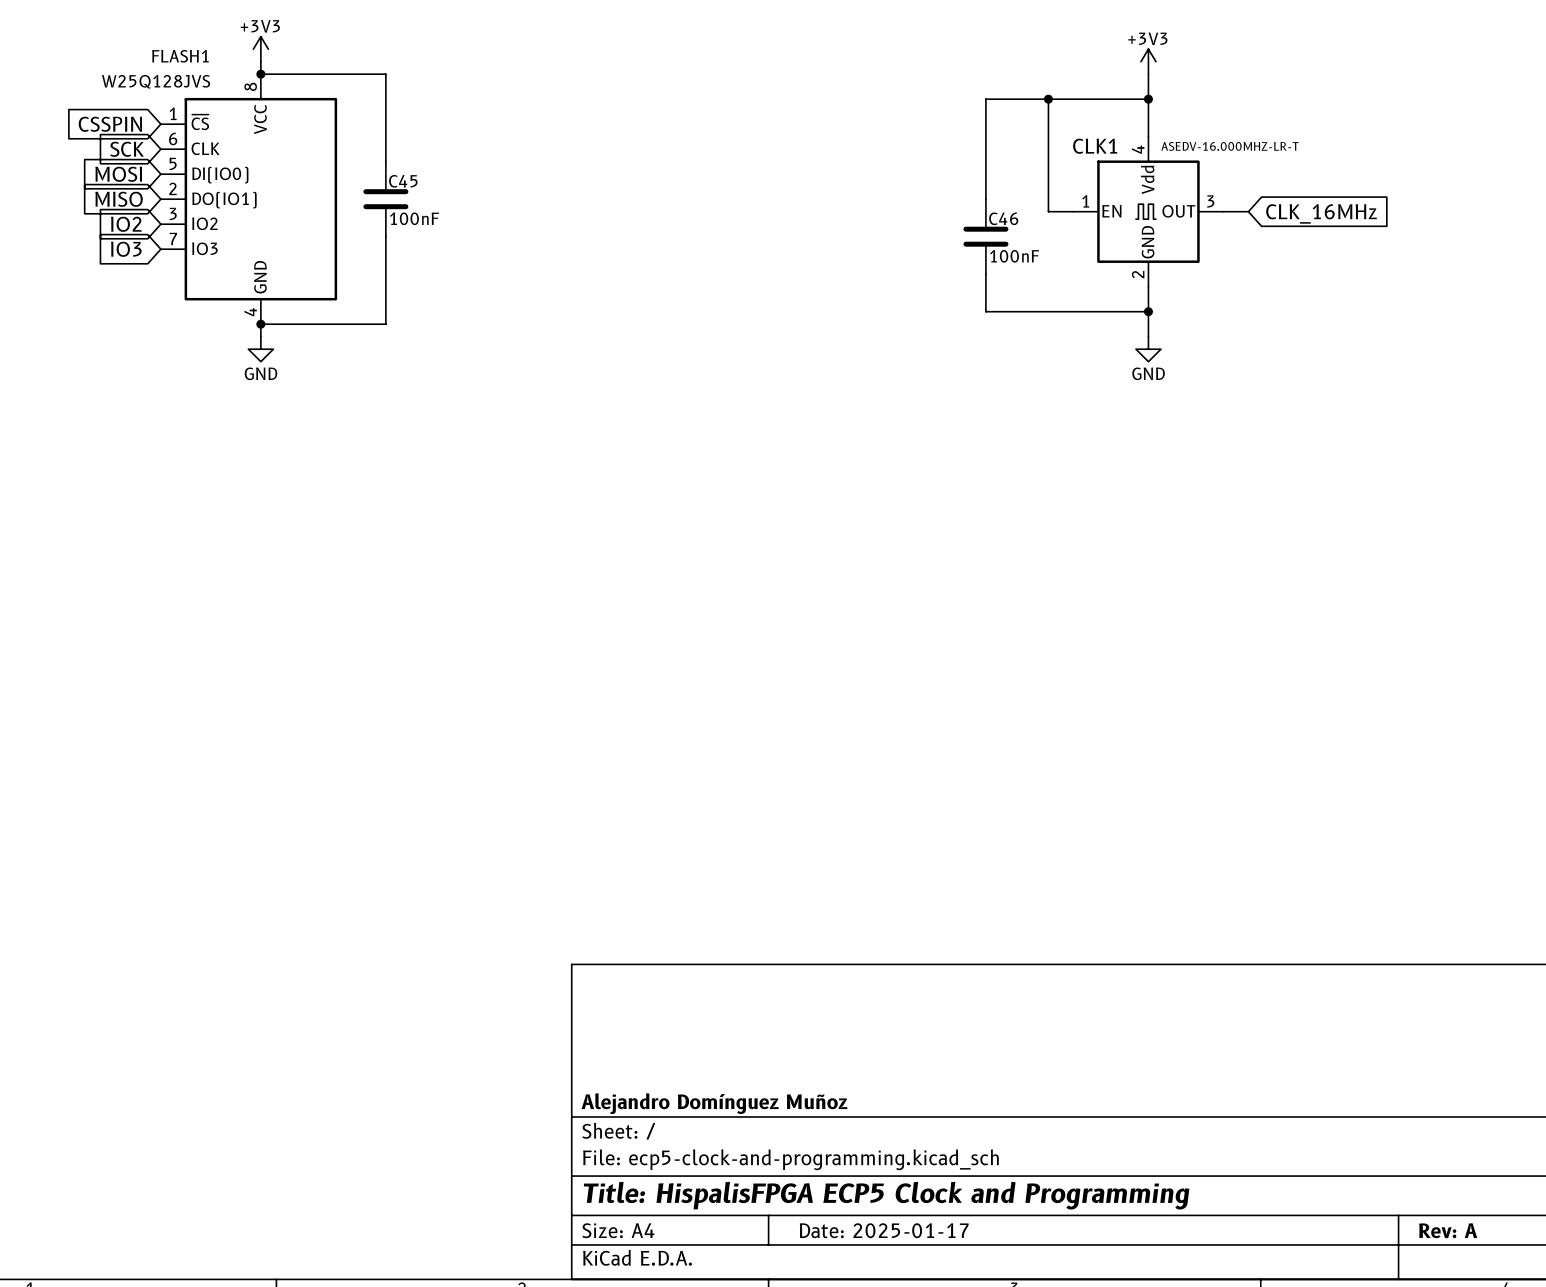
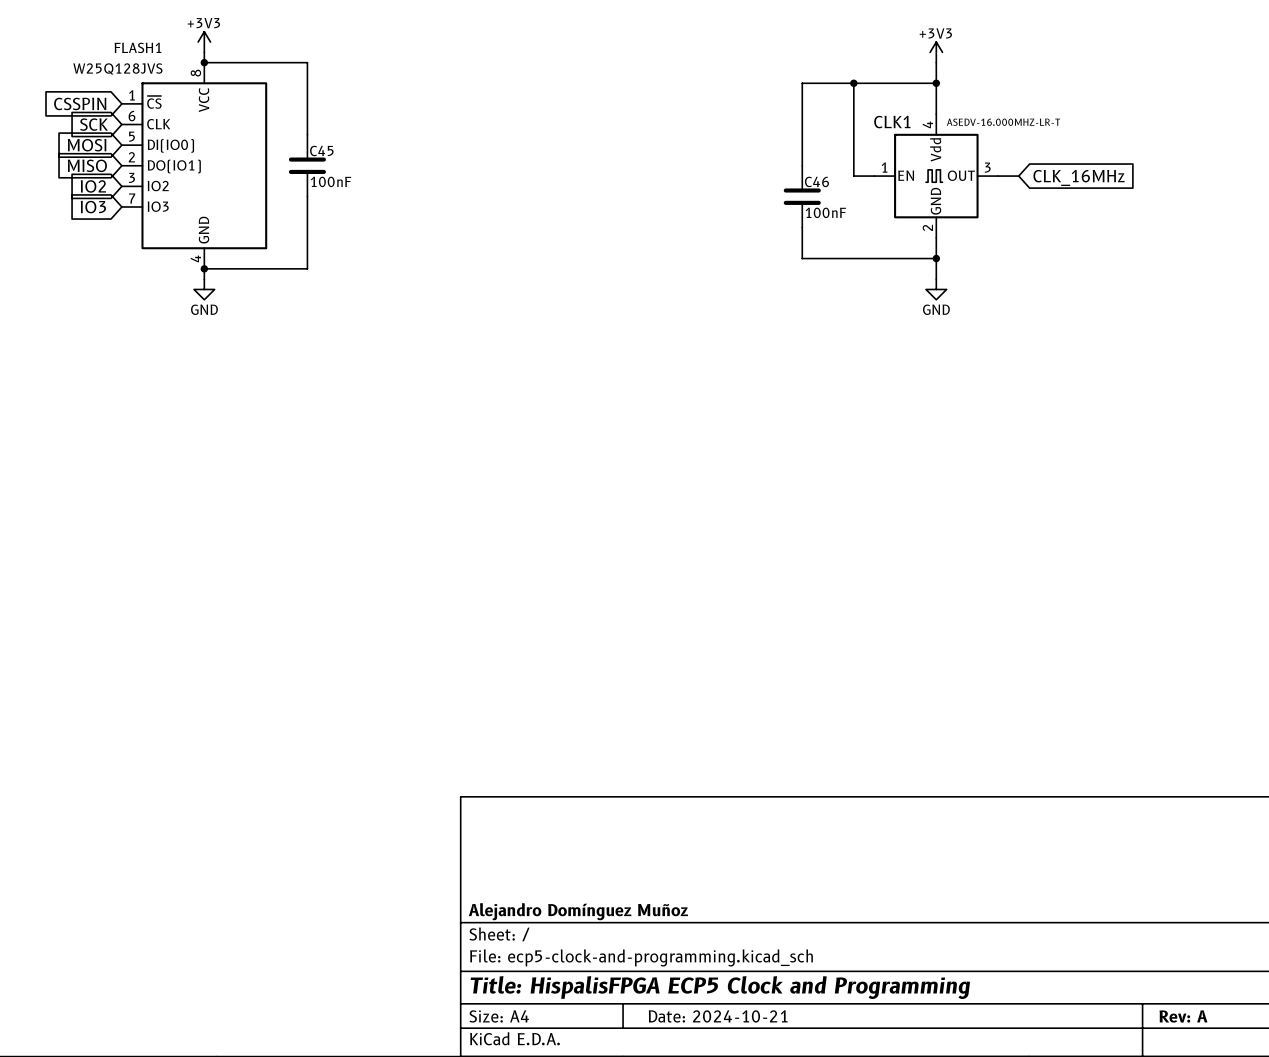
title block: Date: 2025-01-17 (884, 1230) -> Date: 2024-10-21 (718, 1016)

